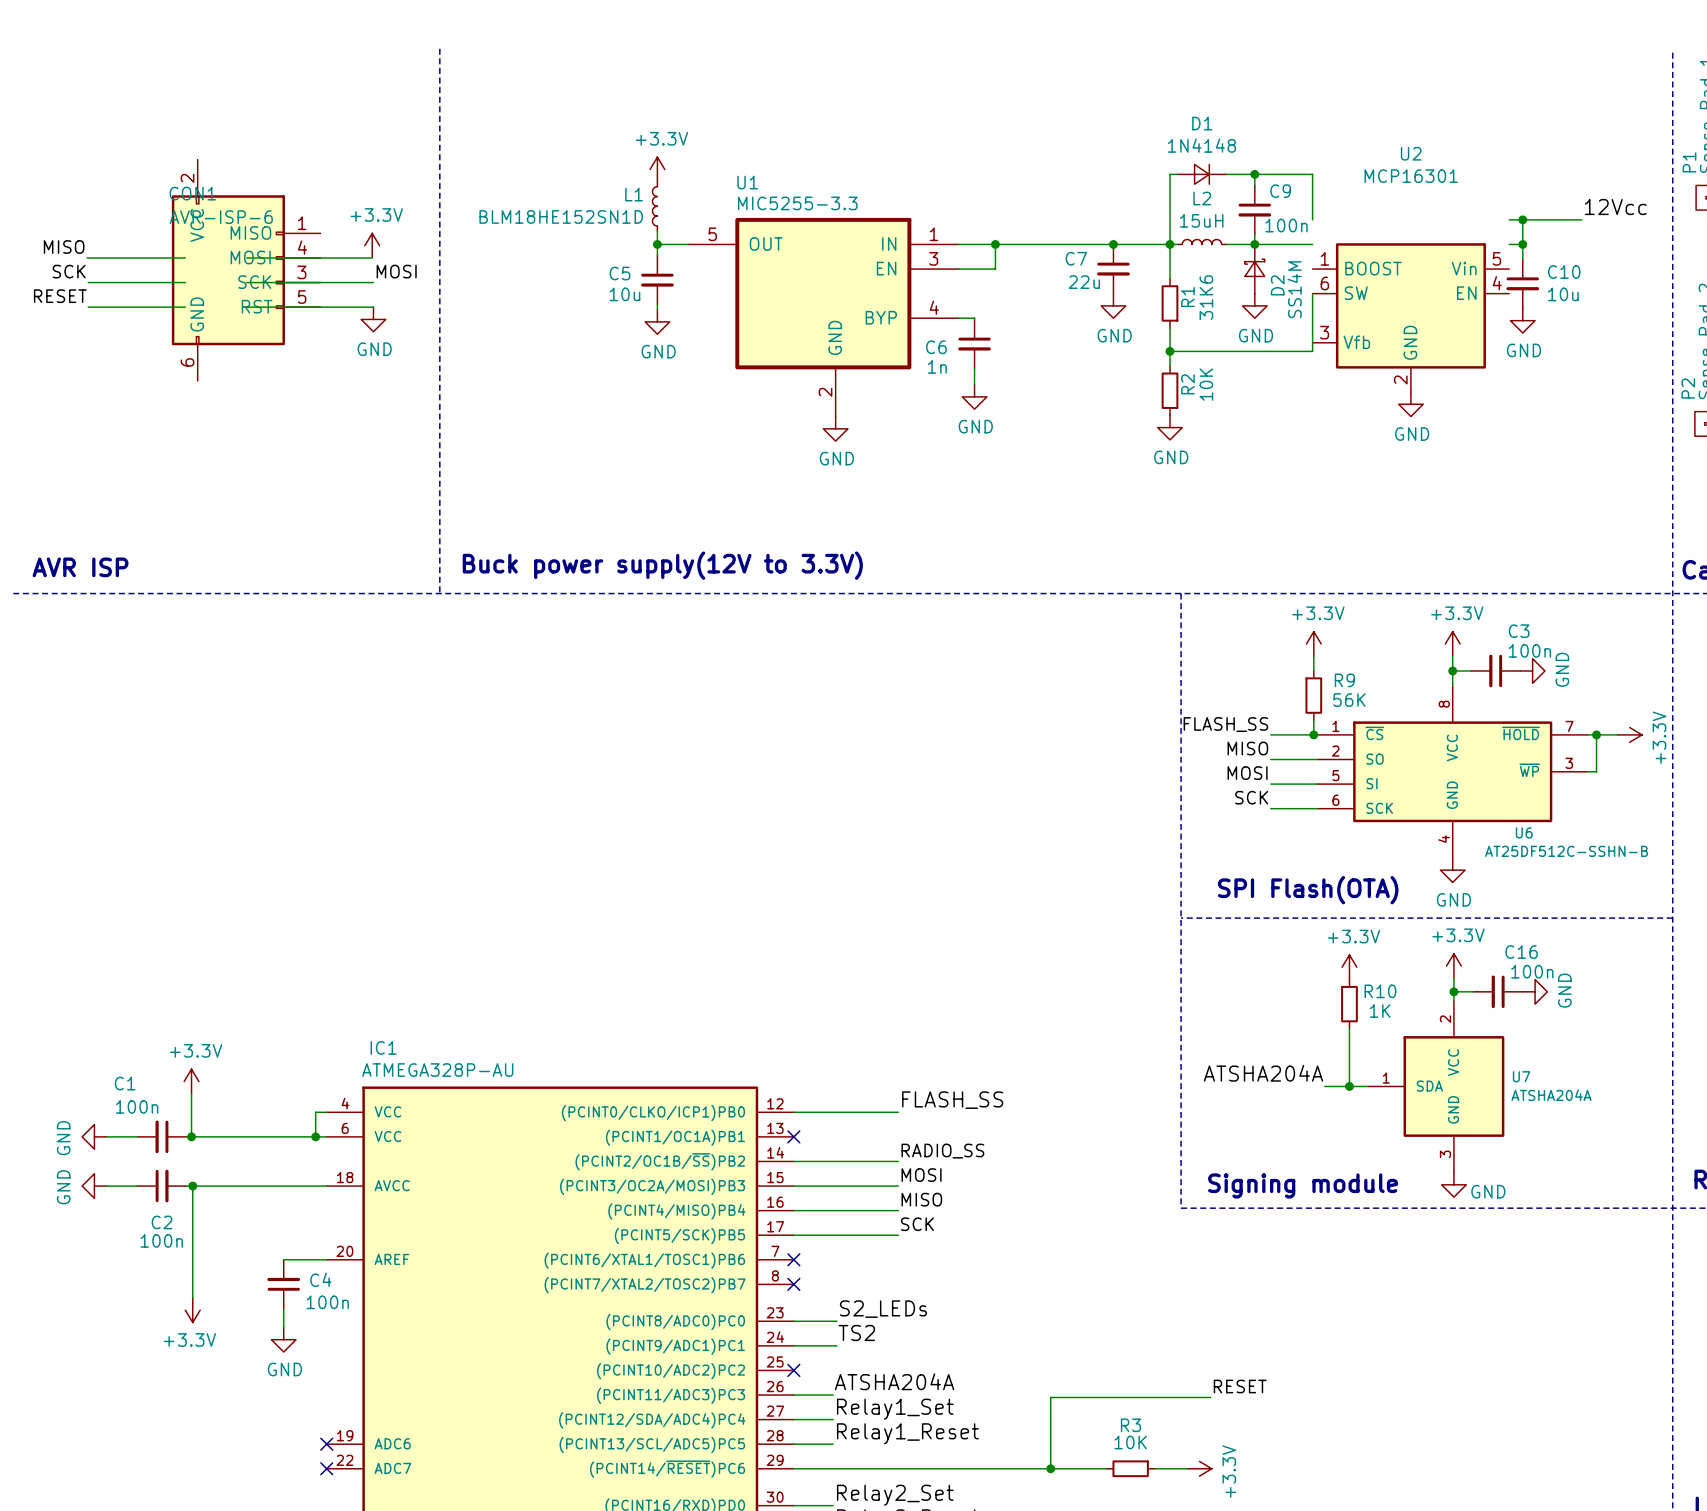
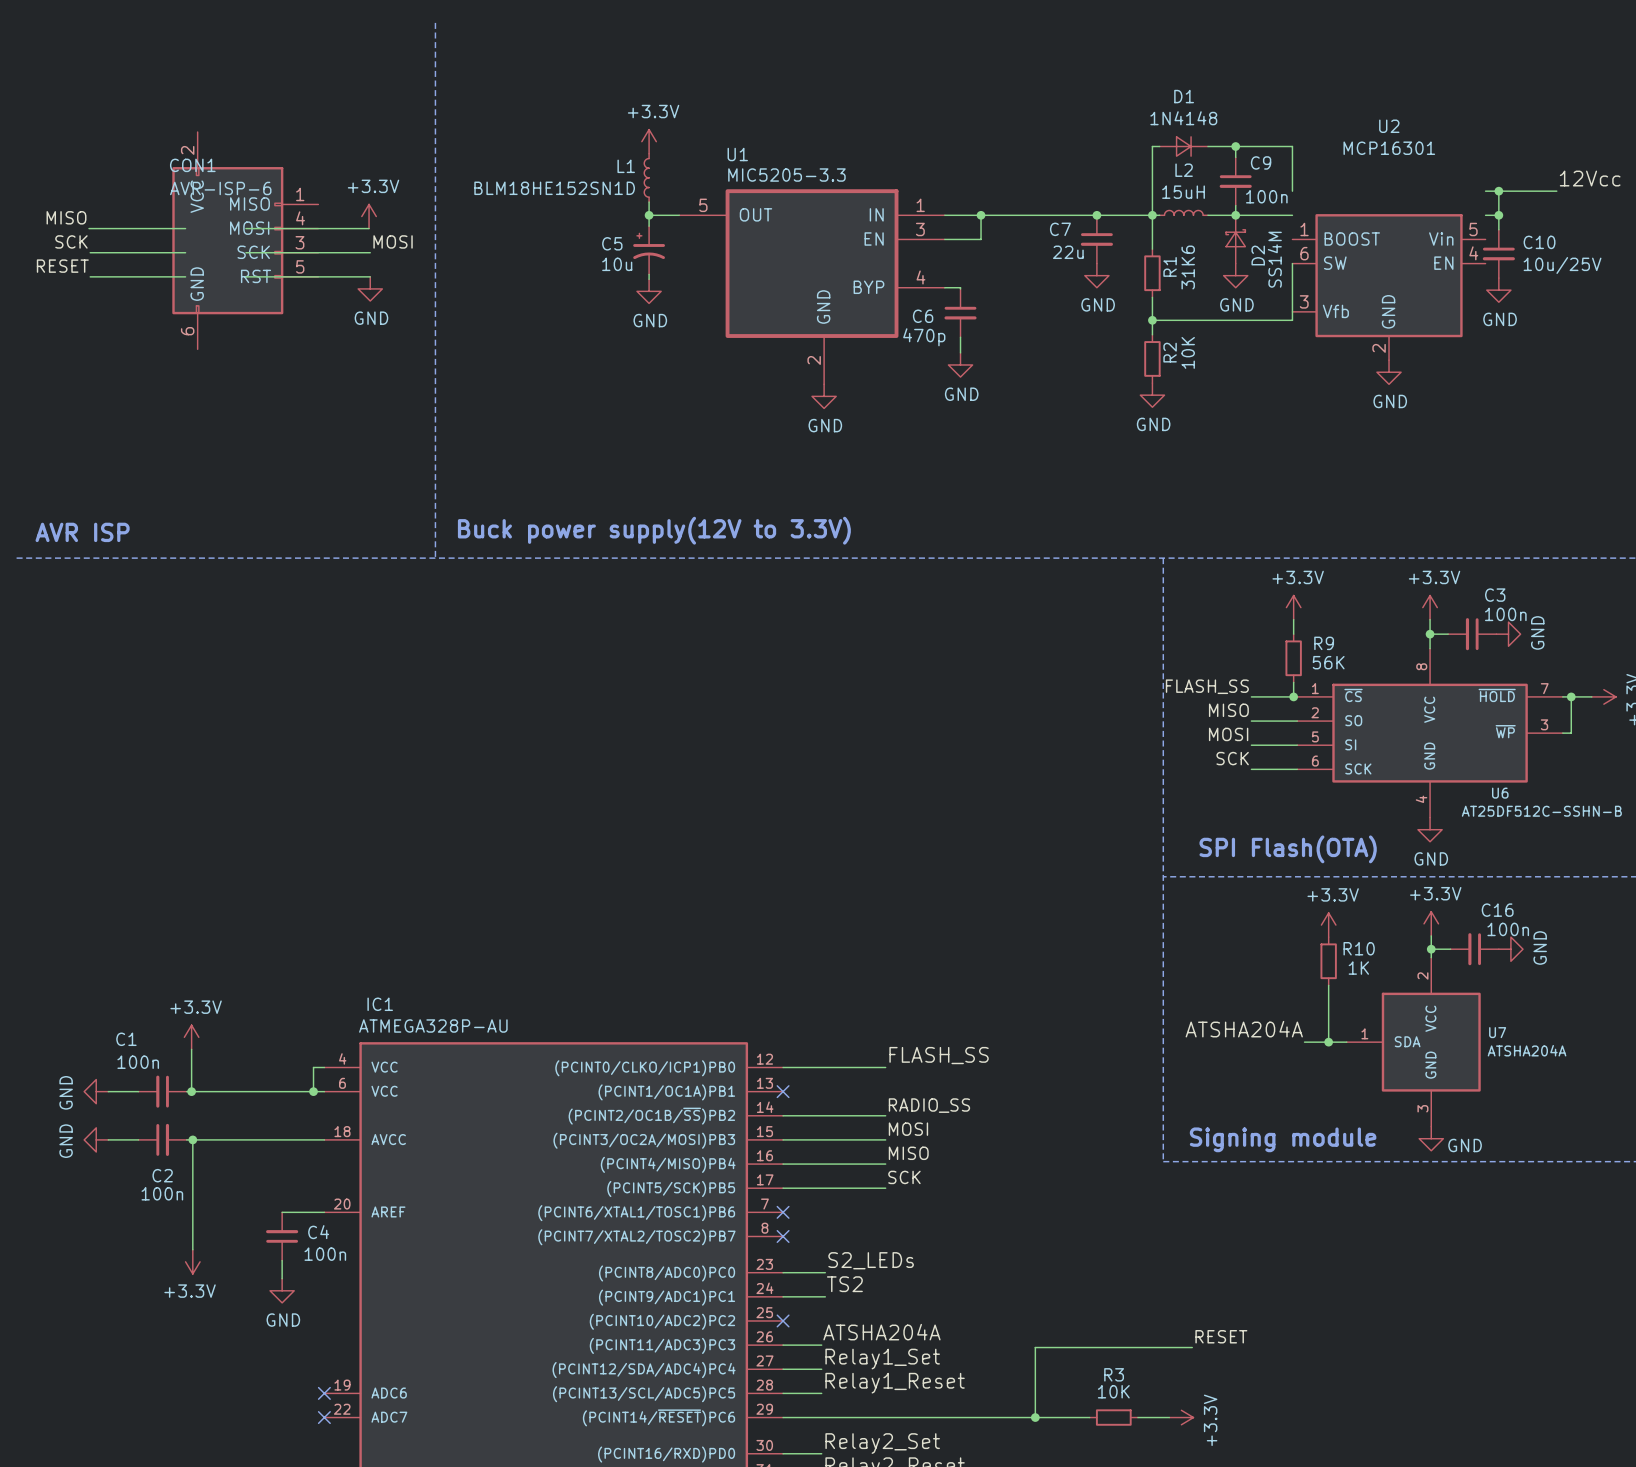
U1 value: MIC5255-3.3 (797, 203) -> MIC5205-3.3 (786, 175)
C5 symbol: [641, 255, 674, 305] -> [633, 226, 666, 275]
C10 value: 10u (1563, 294) -> 10u/25V (1562, 265)
C6 value: 1n (937, 366) -> 470p (924, 337)

